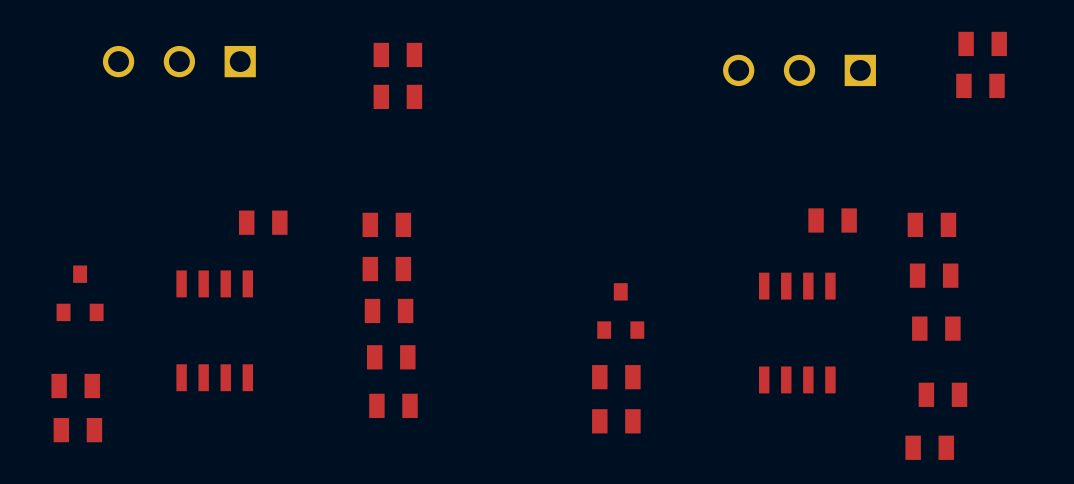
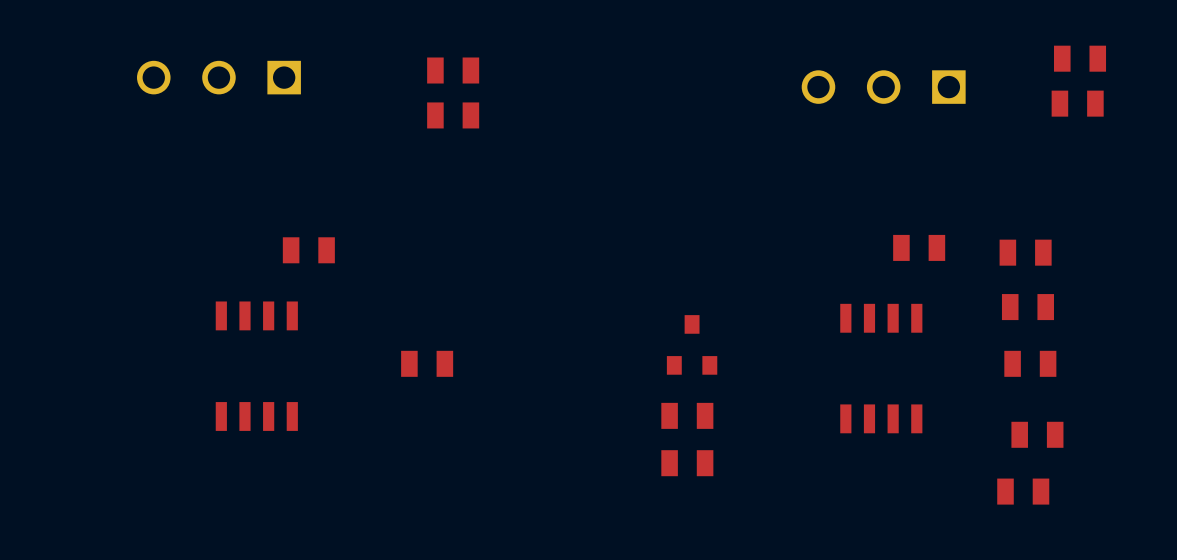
part: (386, 224) -> none
part: (386, 269) -> none
part: (80, 293) -> none
part: (389, 310) -> none
part: none -> (427, 363)
part: (391, 357) -> none
part: (75, 385) -> none
part: (393, 405) -> none
part: (77, 430) -> none

